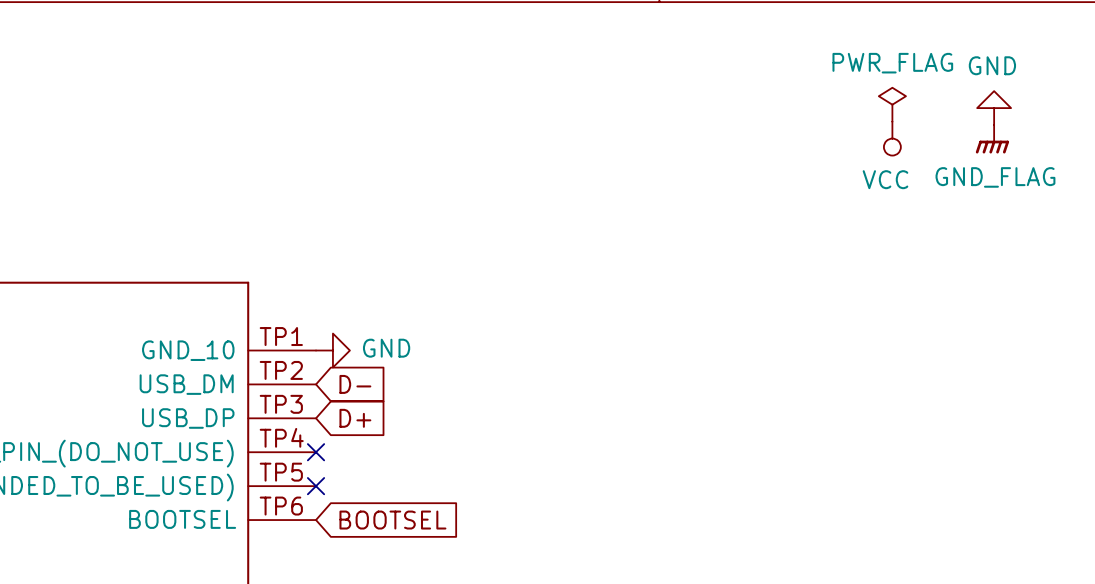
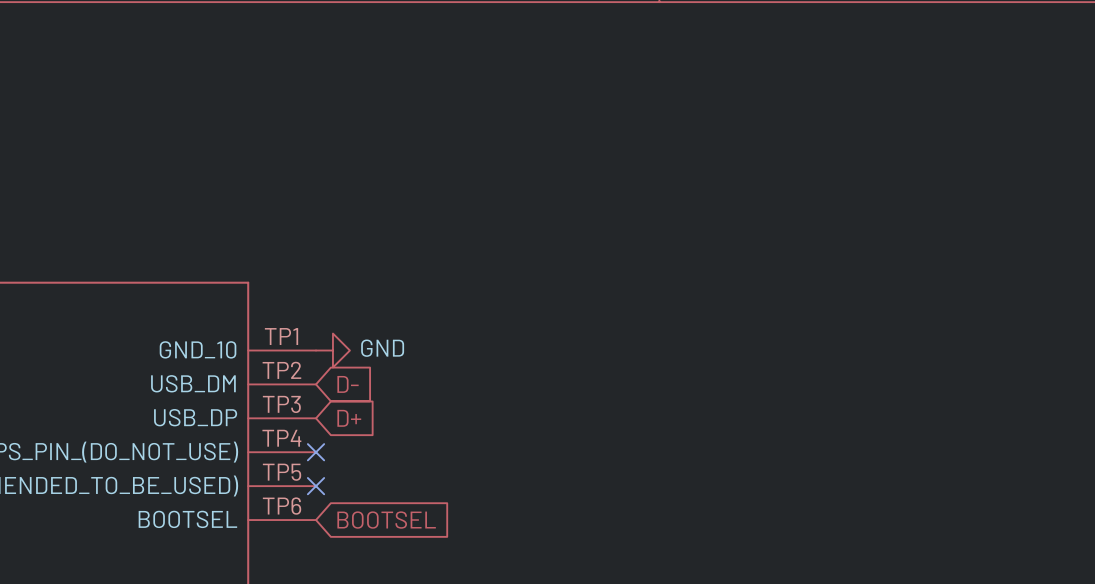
power symbol: PWR_FLAG (892, 104) -> none
power symbol: GND (994, 108) -> none
power symbol: VCC (892, 138) -> none
power symbol: GND_FLAG (992, 139) -> none

